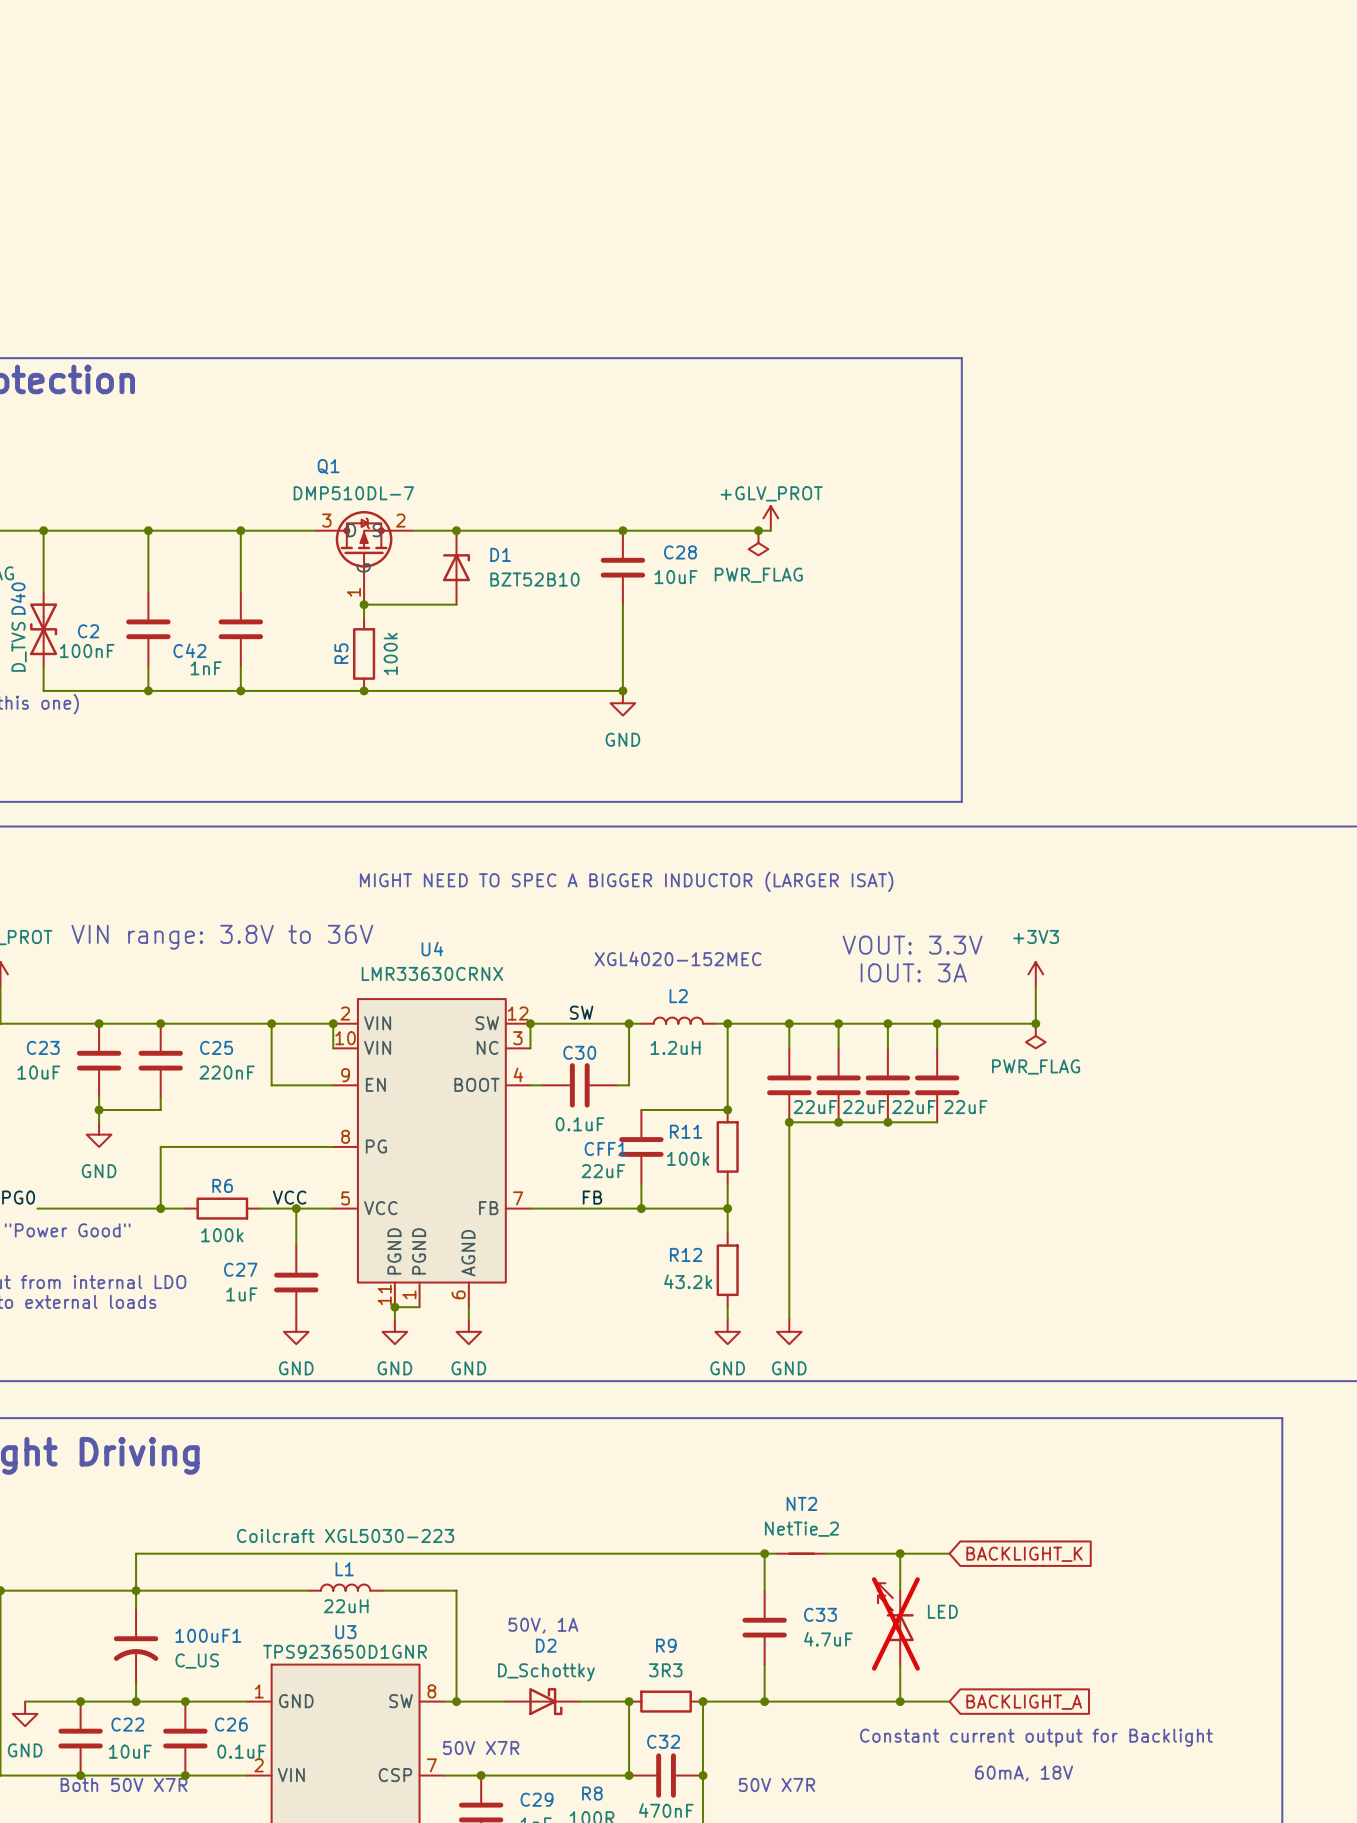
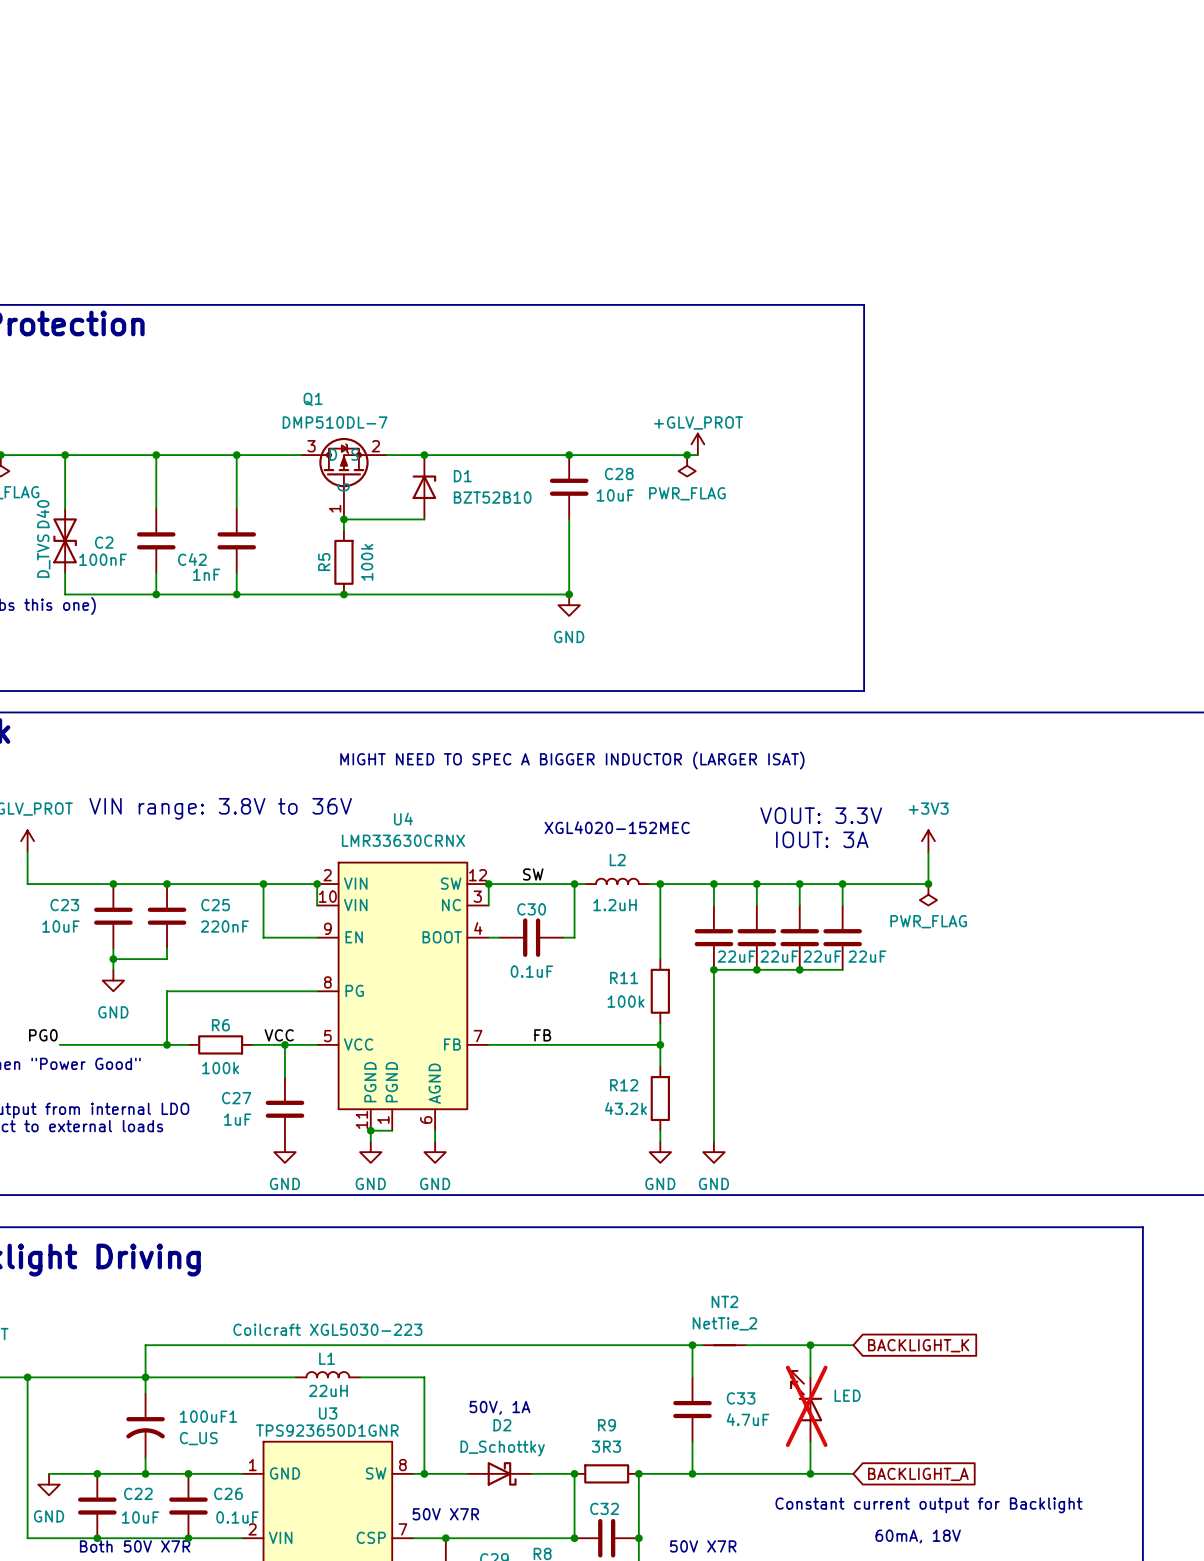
wire: (641, 1109) (727, 1109) -> none
junction: (727, 1109) -> none
CFF1: 22uF (641, 1146) -> none
wire: (641, 1183) (641, 1208) -> none
junction: (641, 1208) -> none

